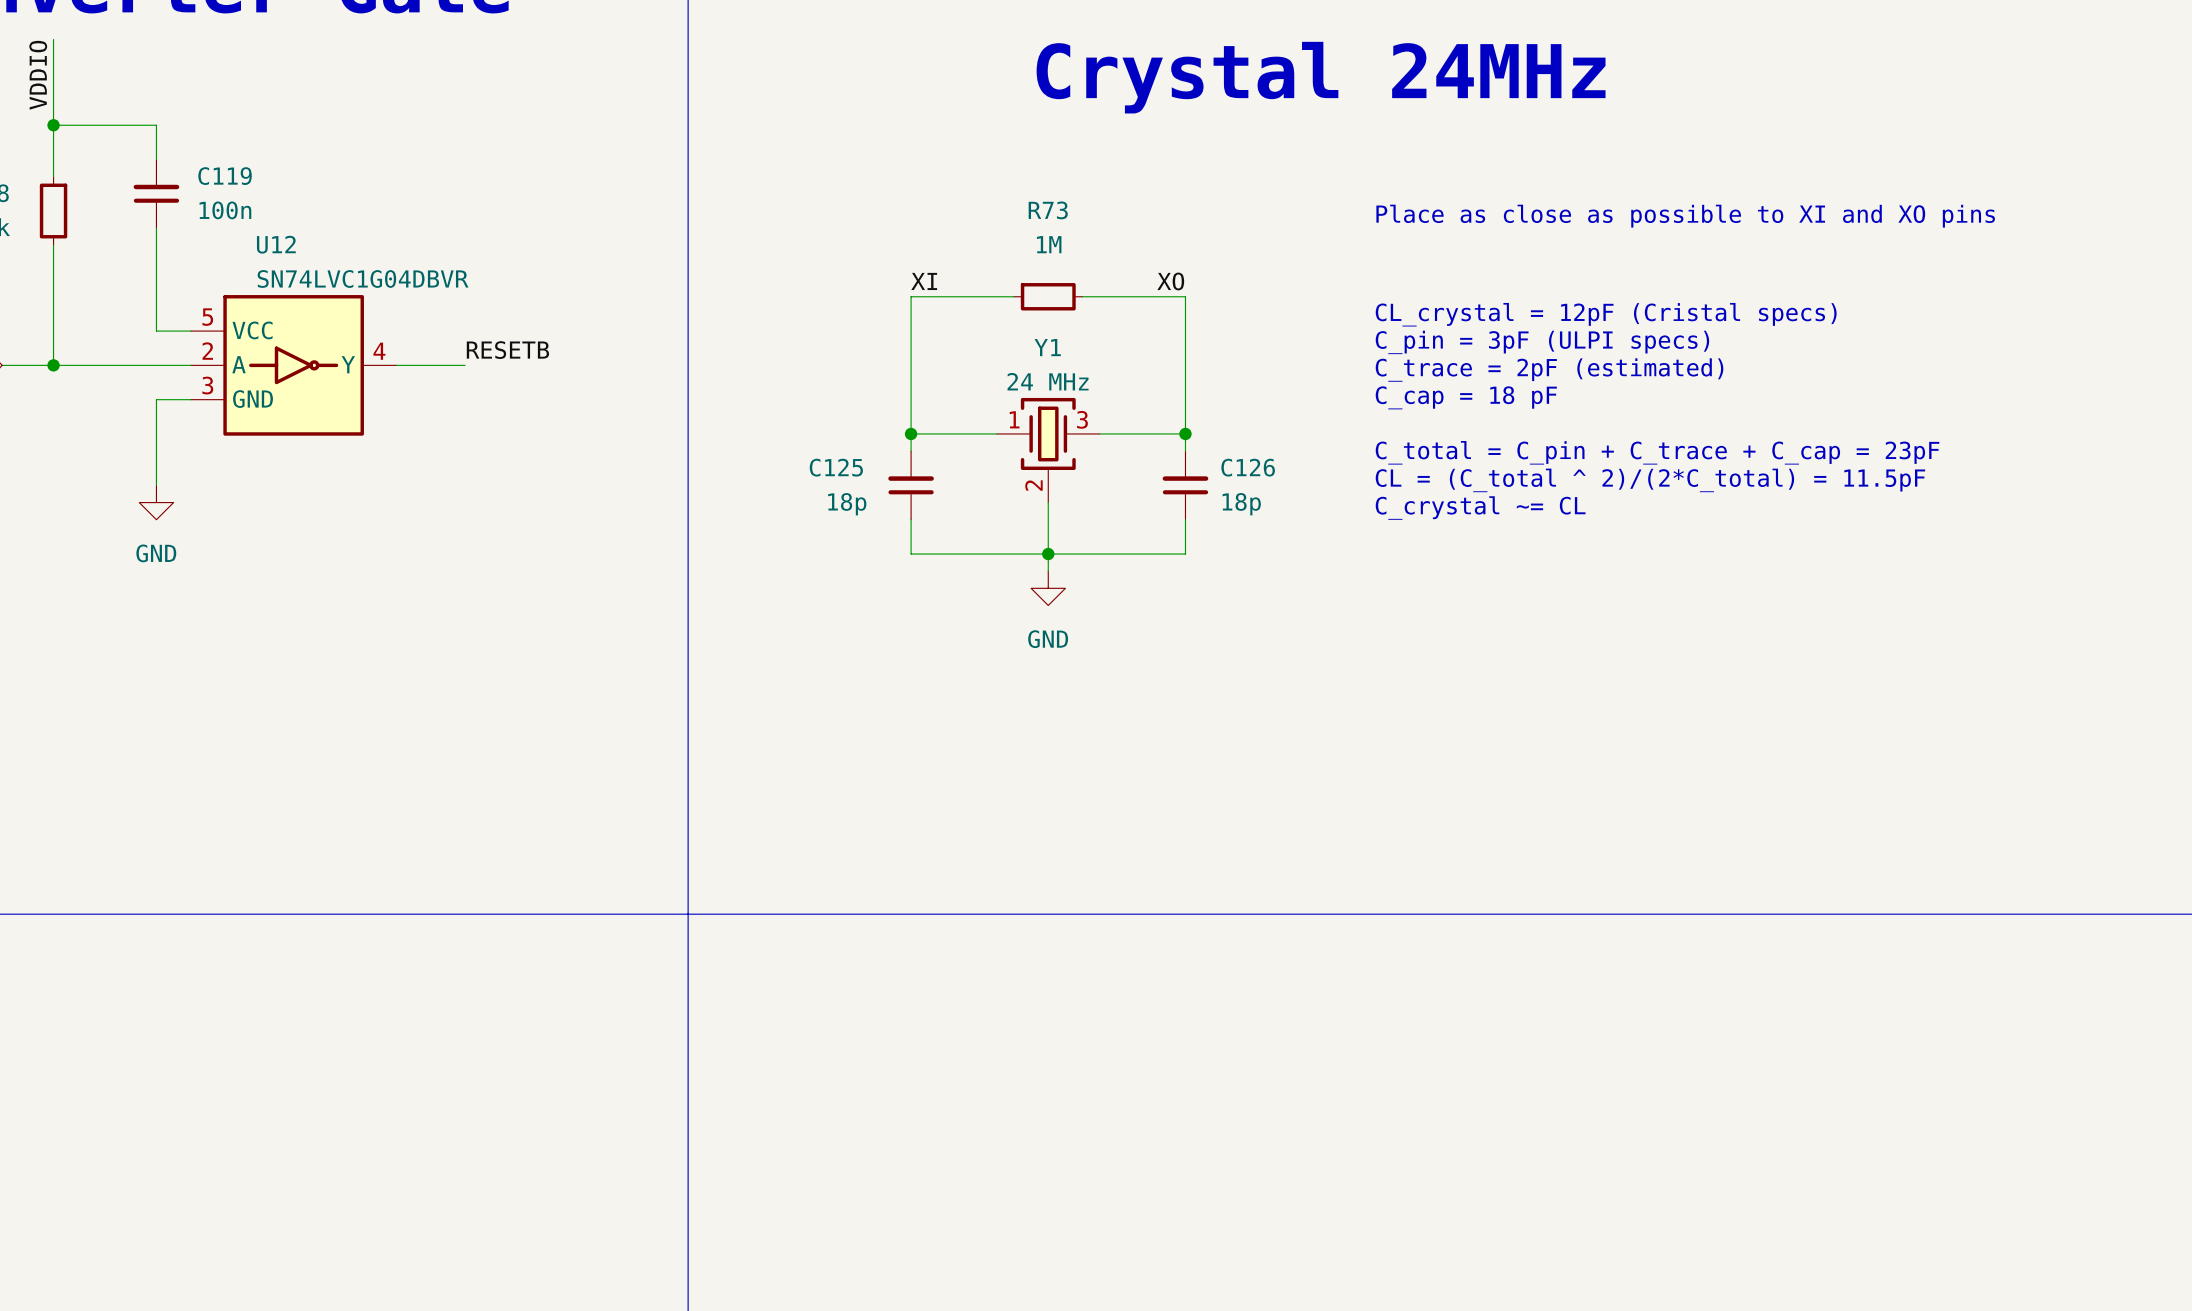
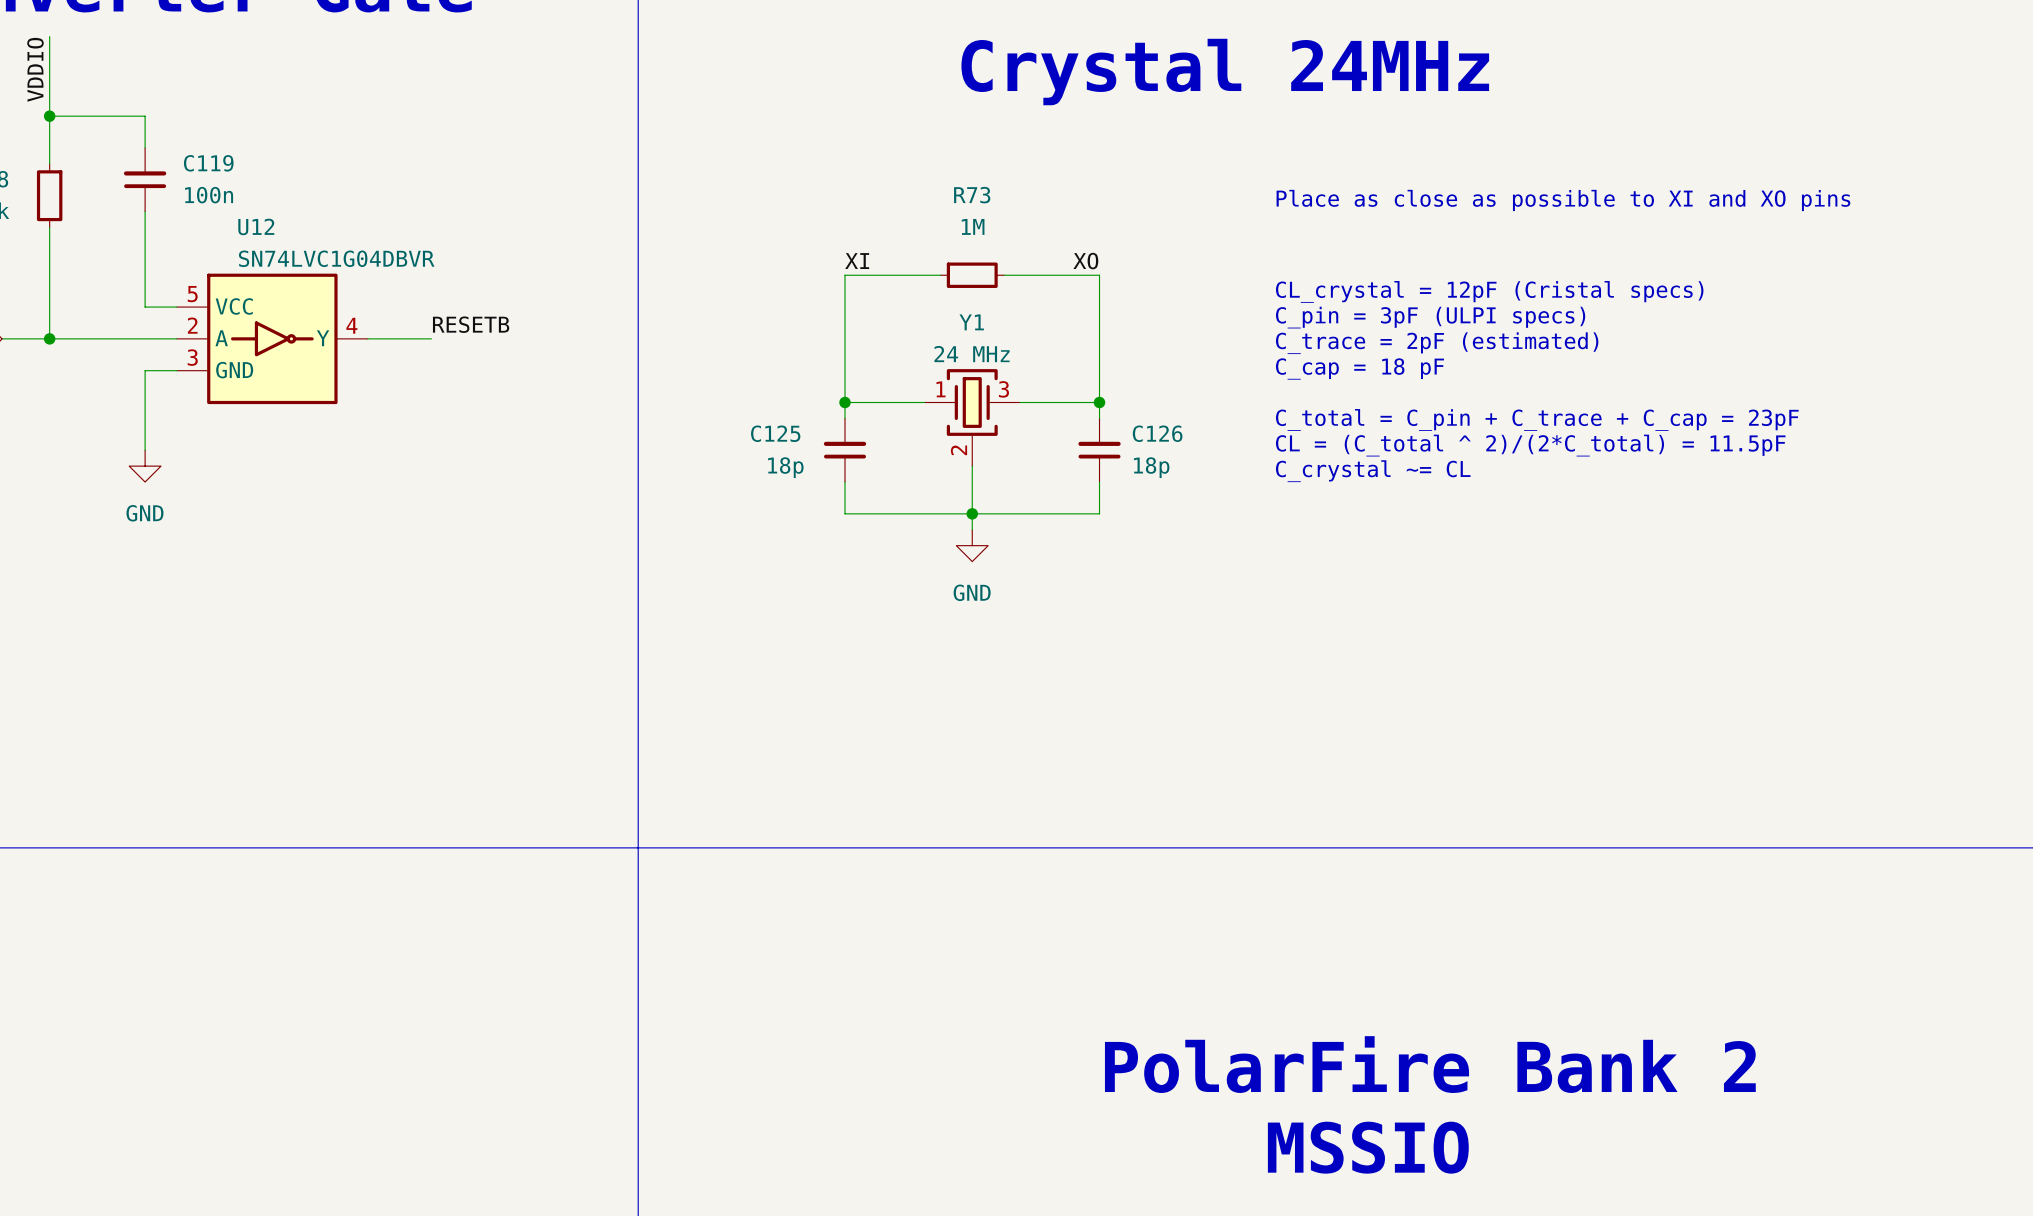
text: none -> PolarFire Bank 2 (1430, 1064)
text: none -> MSSIO (1368, 1147)

